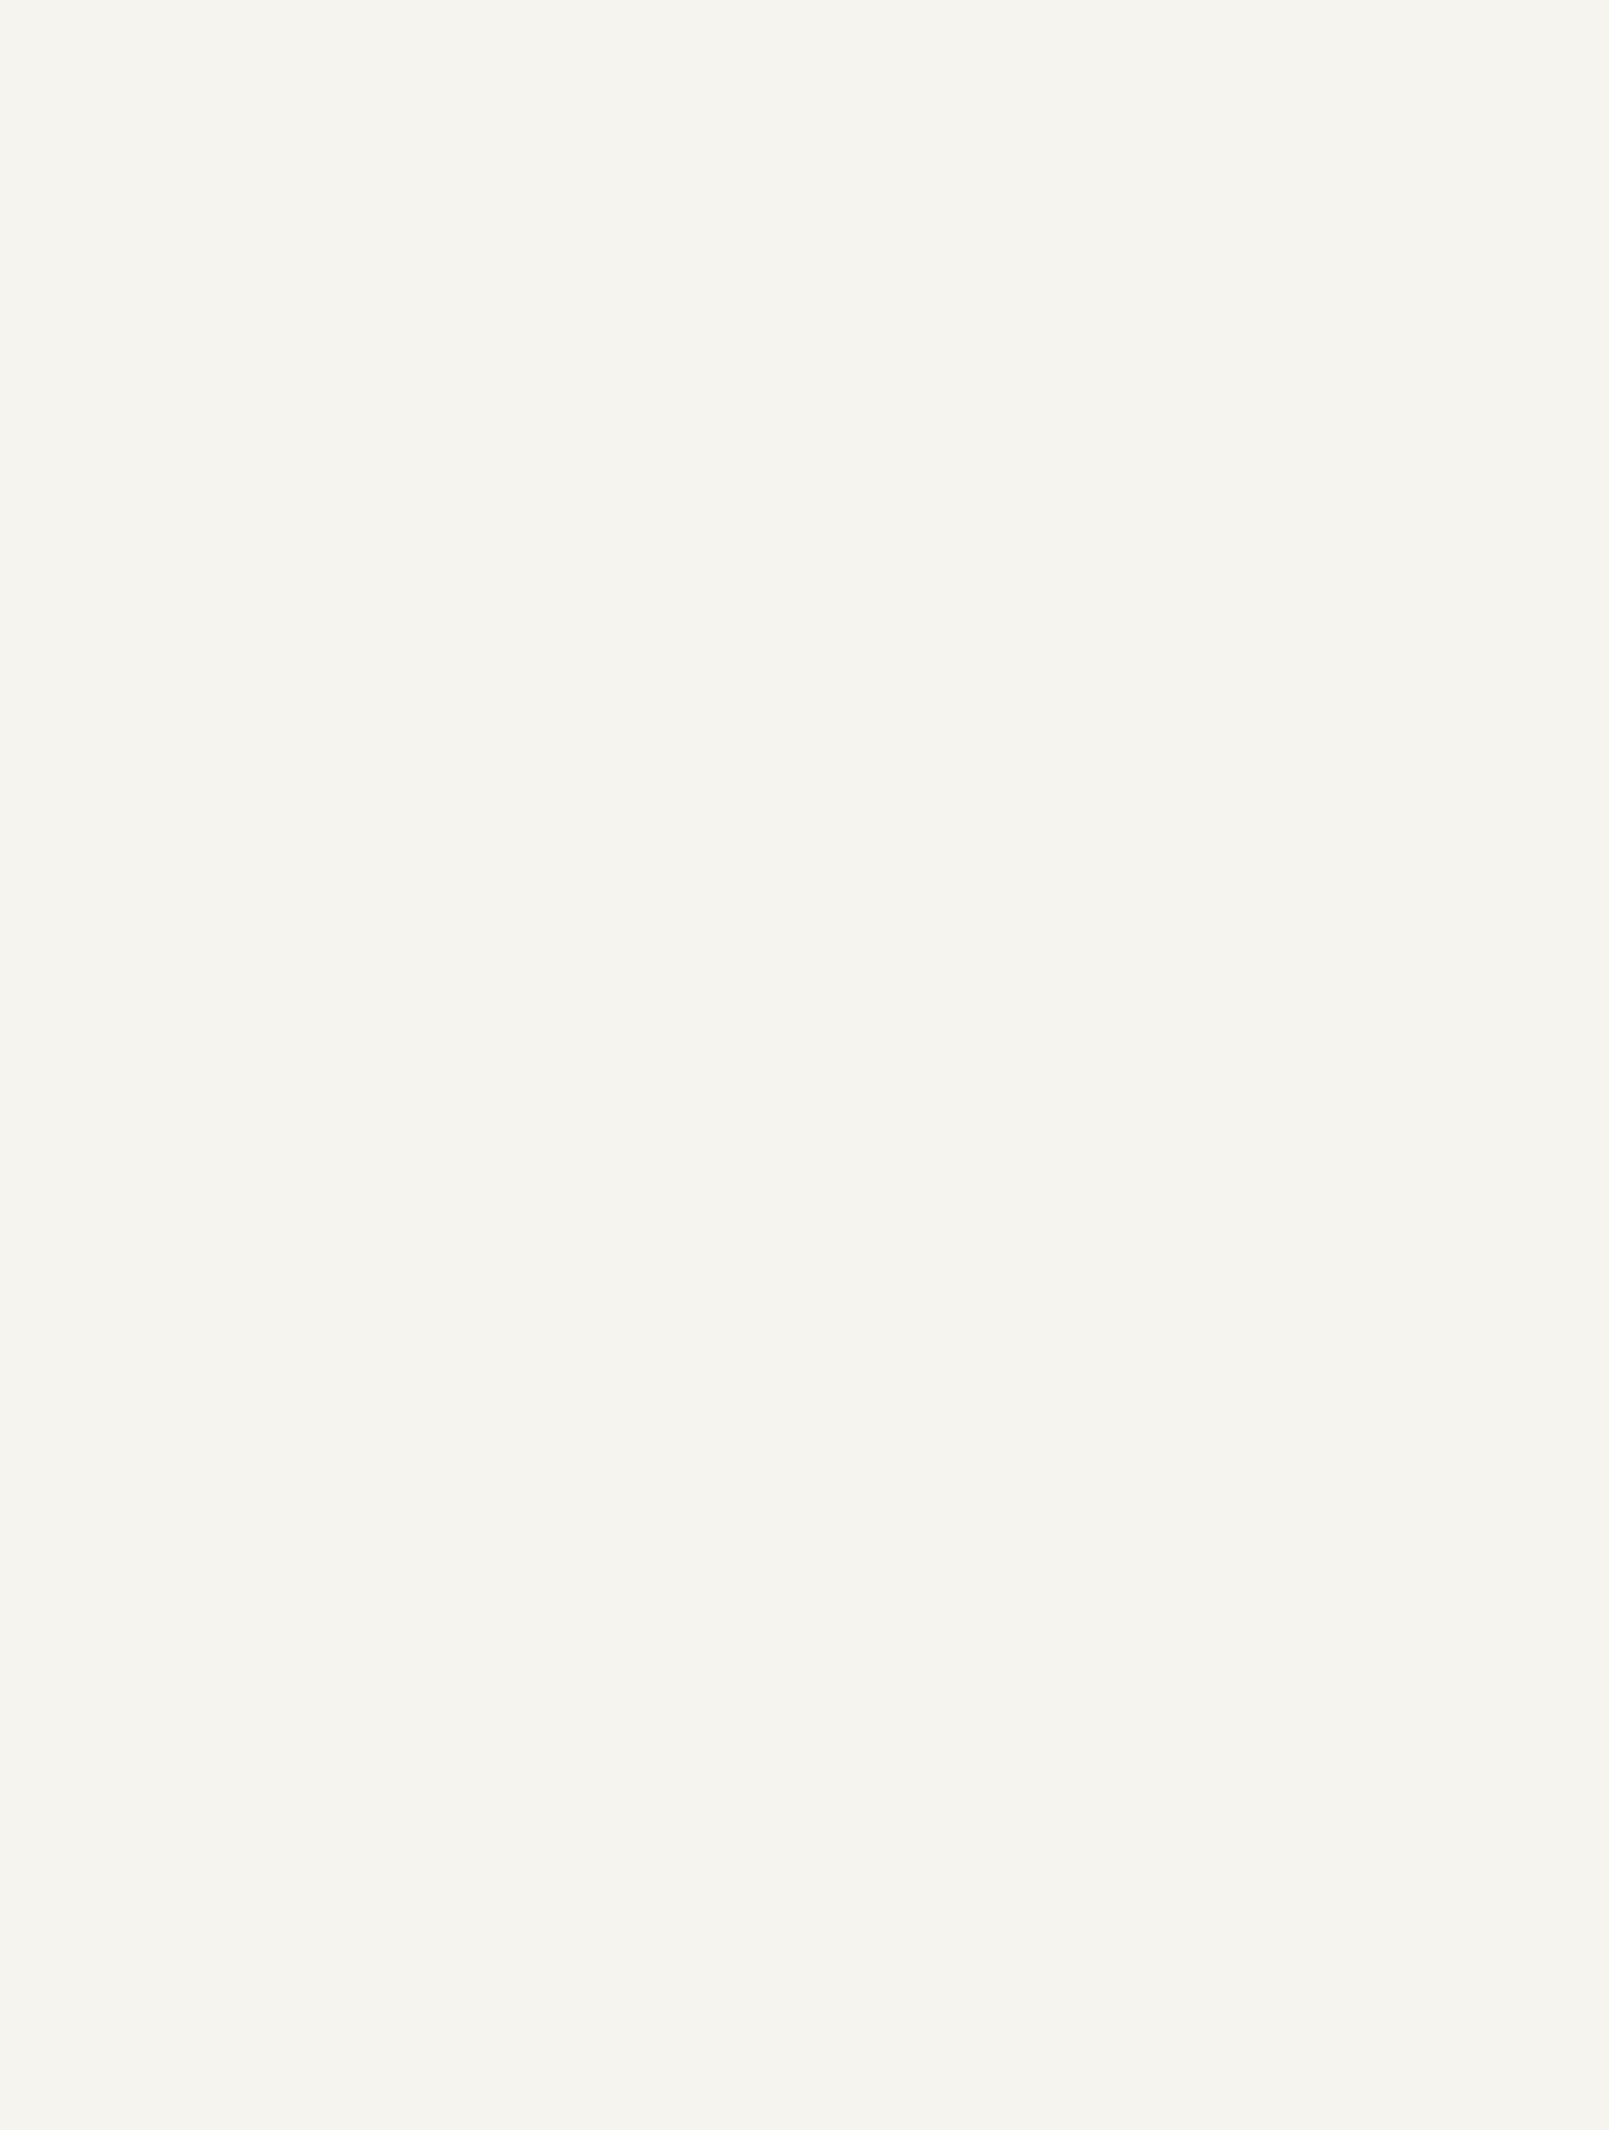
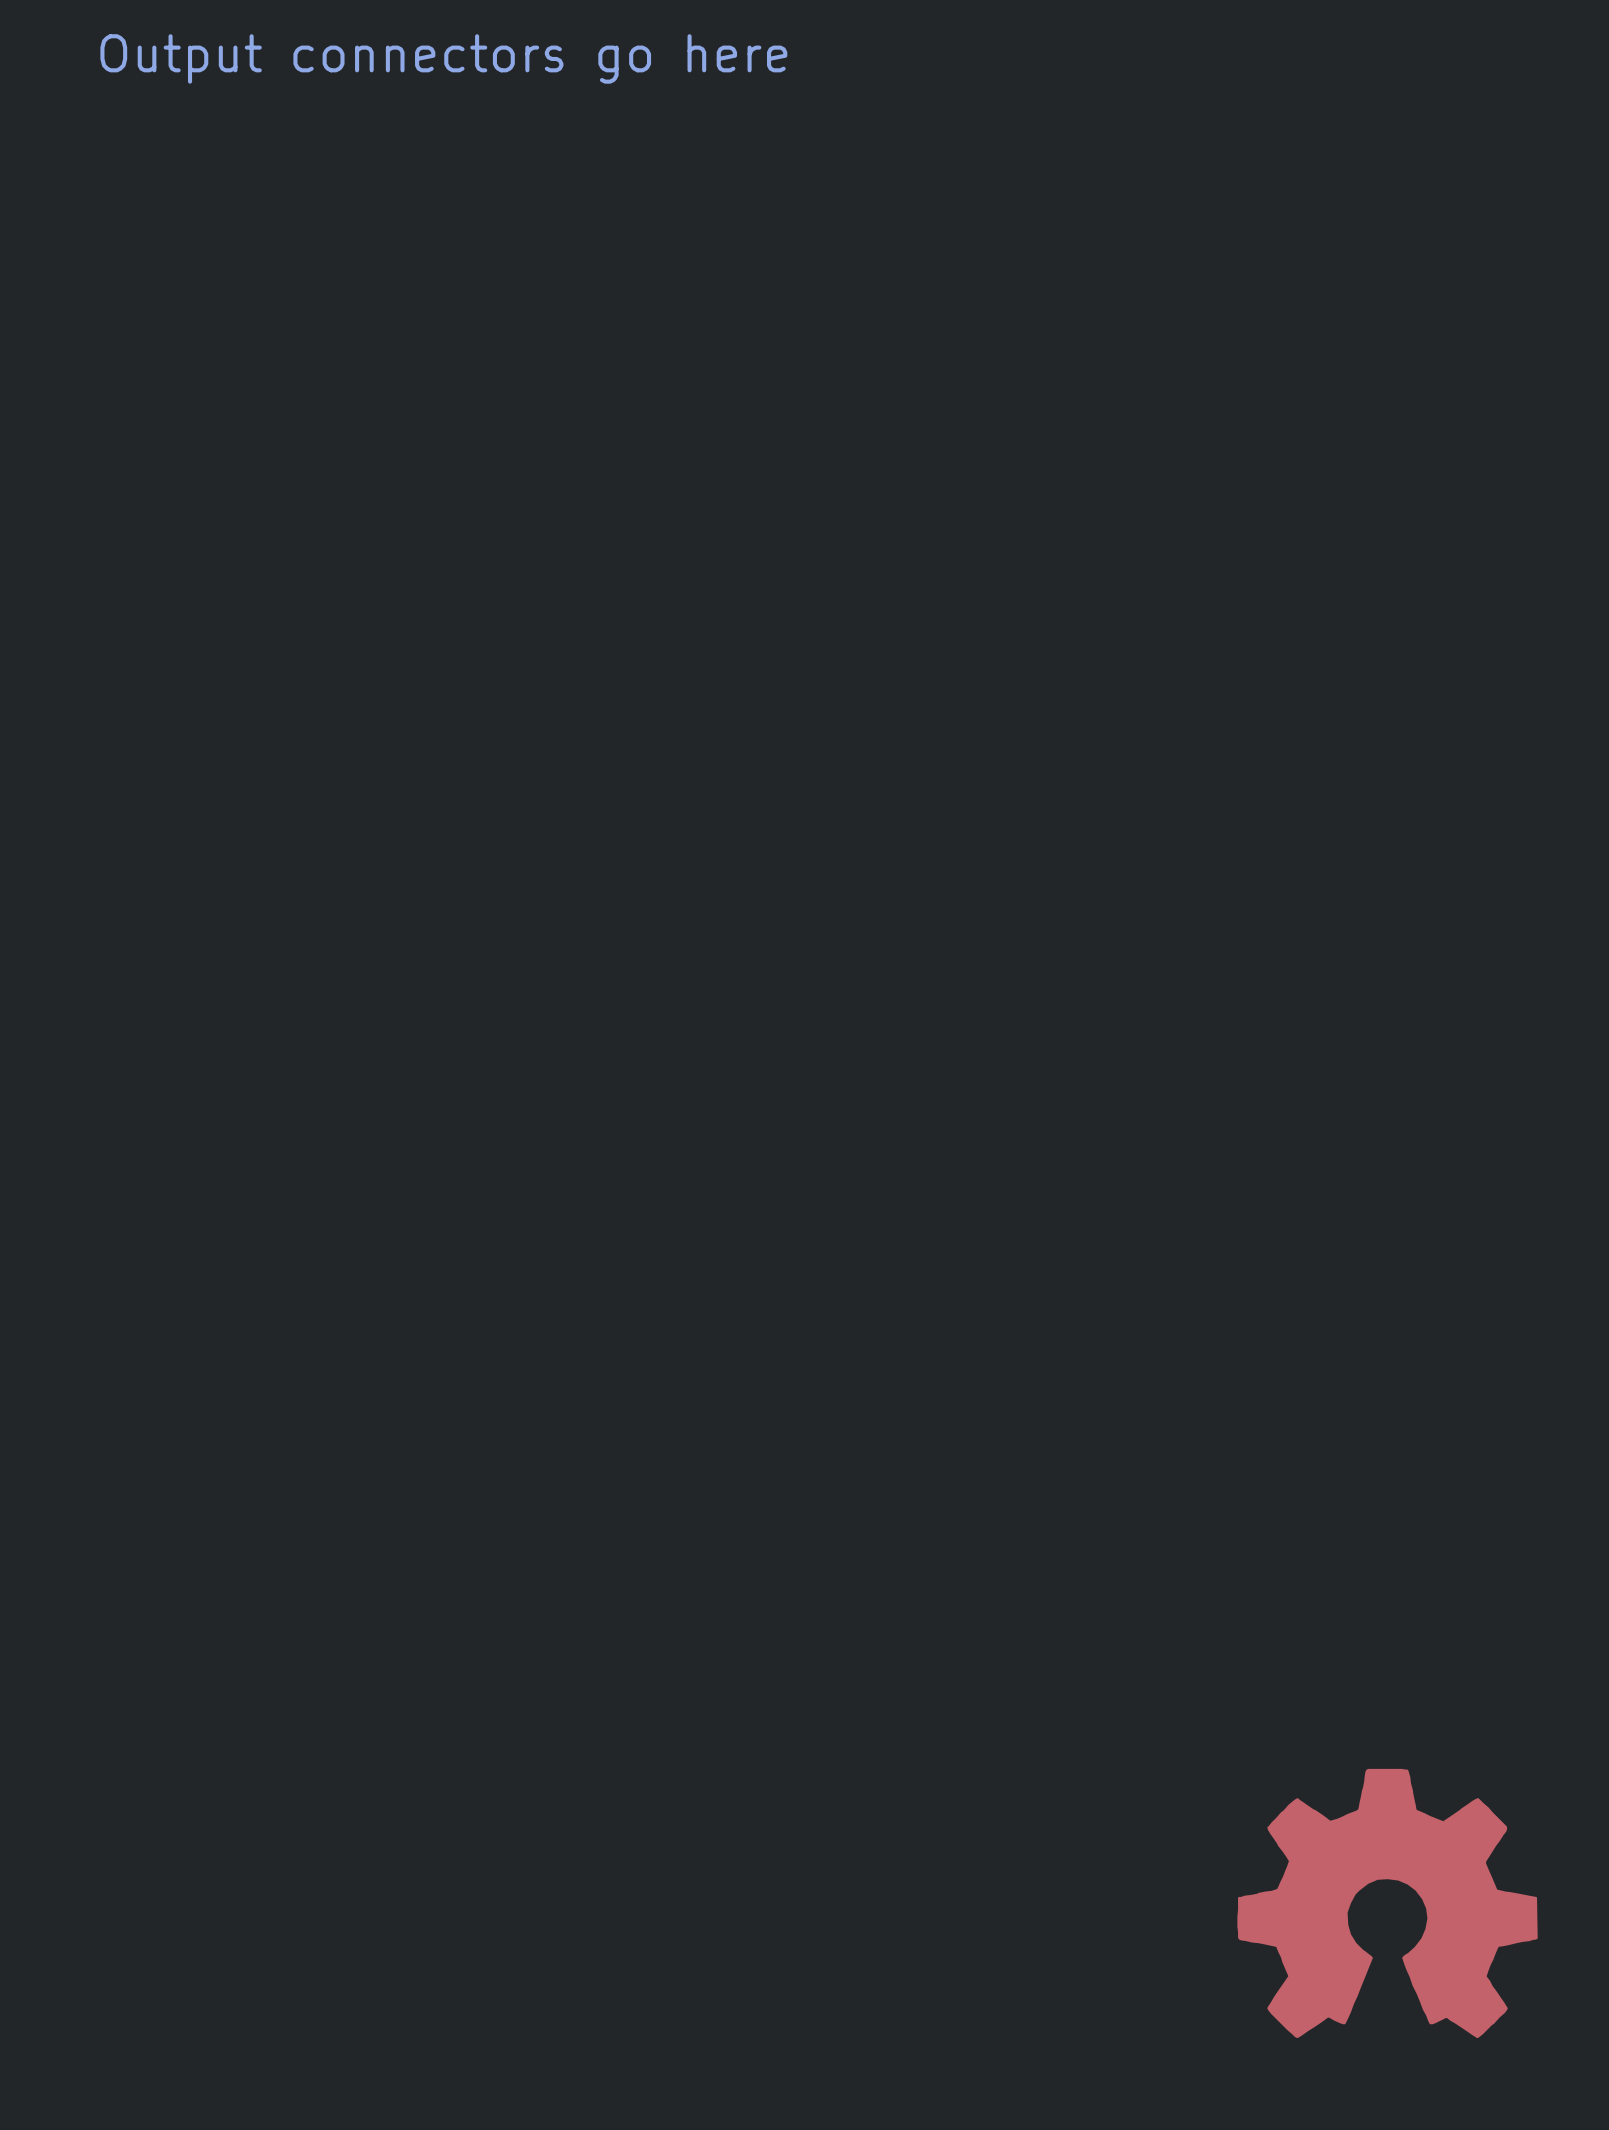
text: none -> Output connectors go here (443, 58)
part: none -> (1387, 1903)

